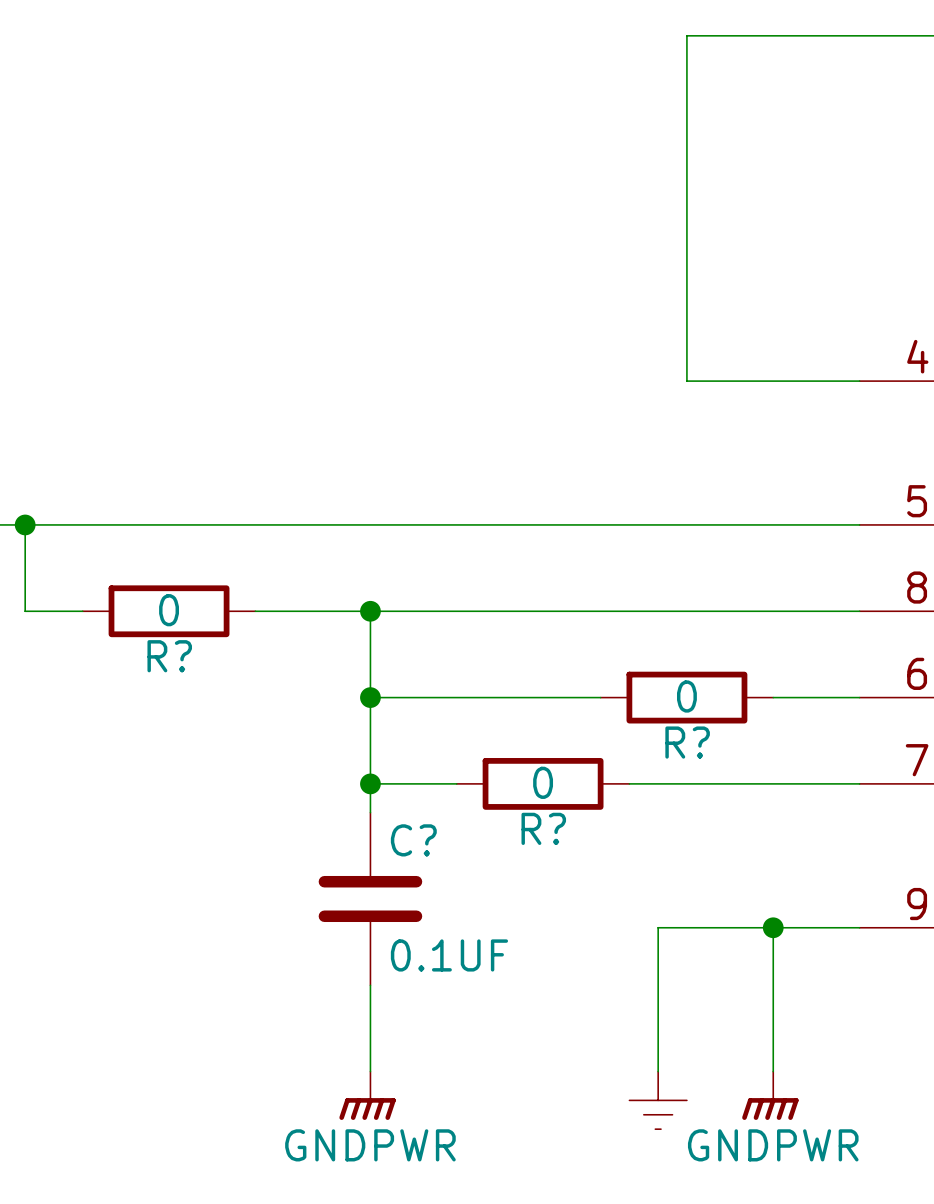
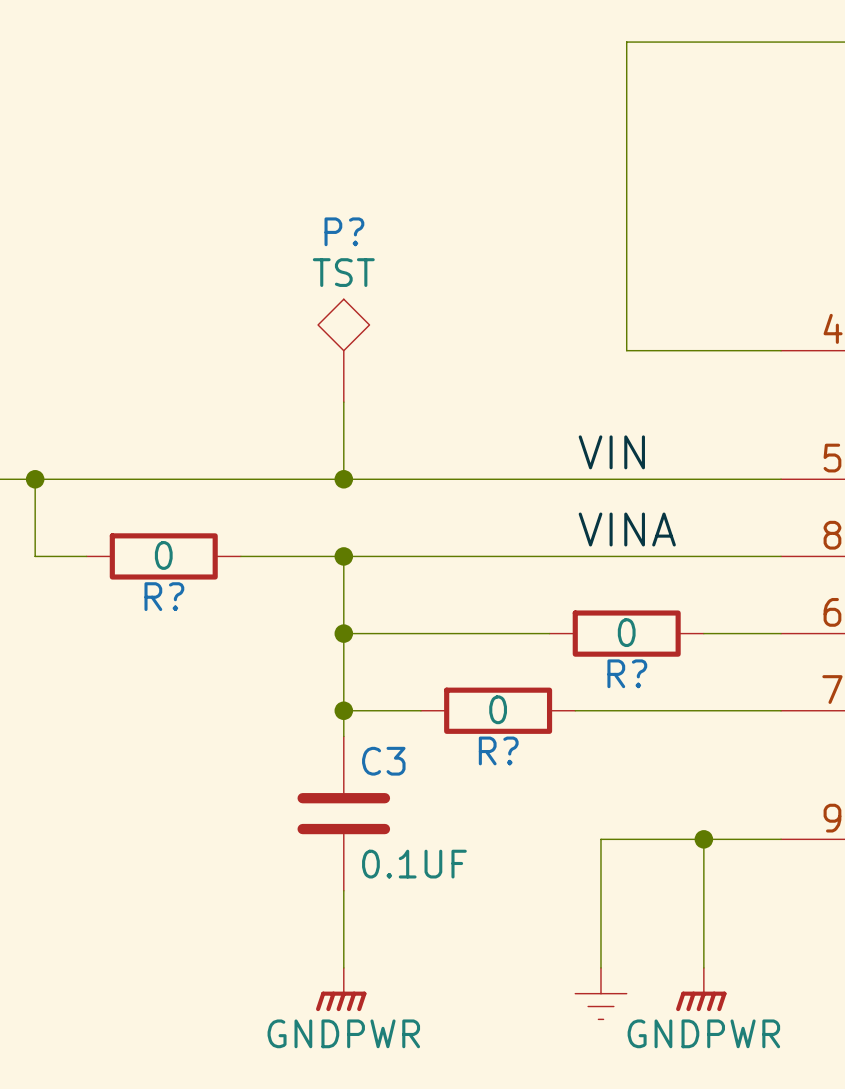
P?: none -> TST (343, 350)
wire: none -> (343, 402) (343, 479)
label: none -> VIN (611, 452)
junction: none -> (343, 479)
label: none -> VINA (627, 529)
C? name: C? (413, 840) -> C3 (383, 761)

